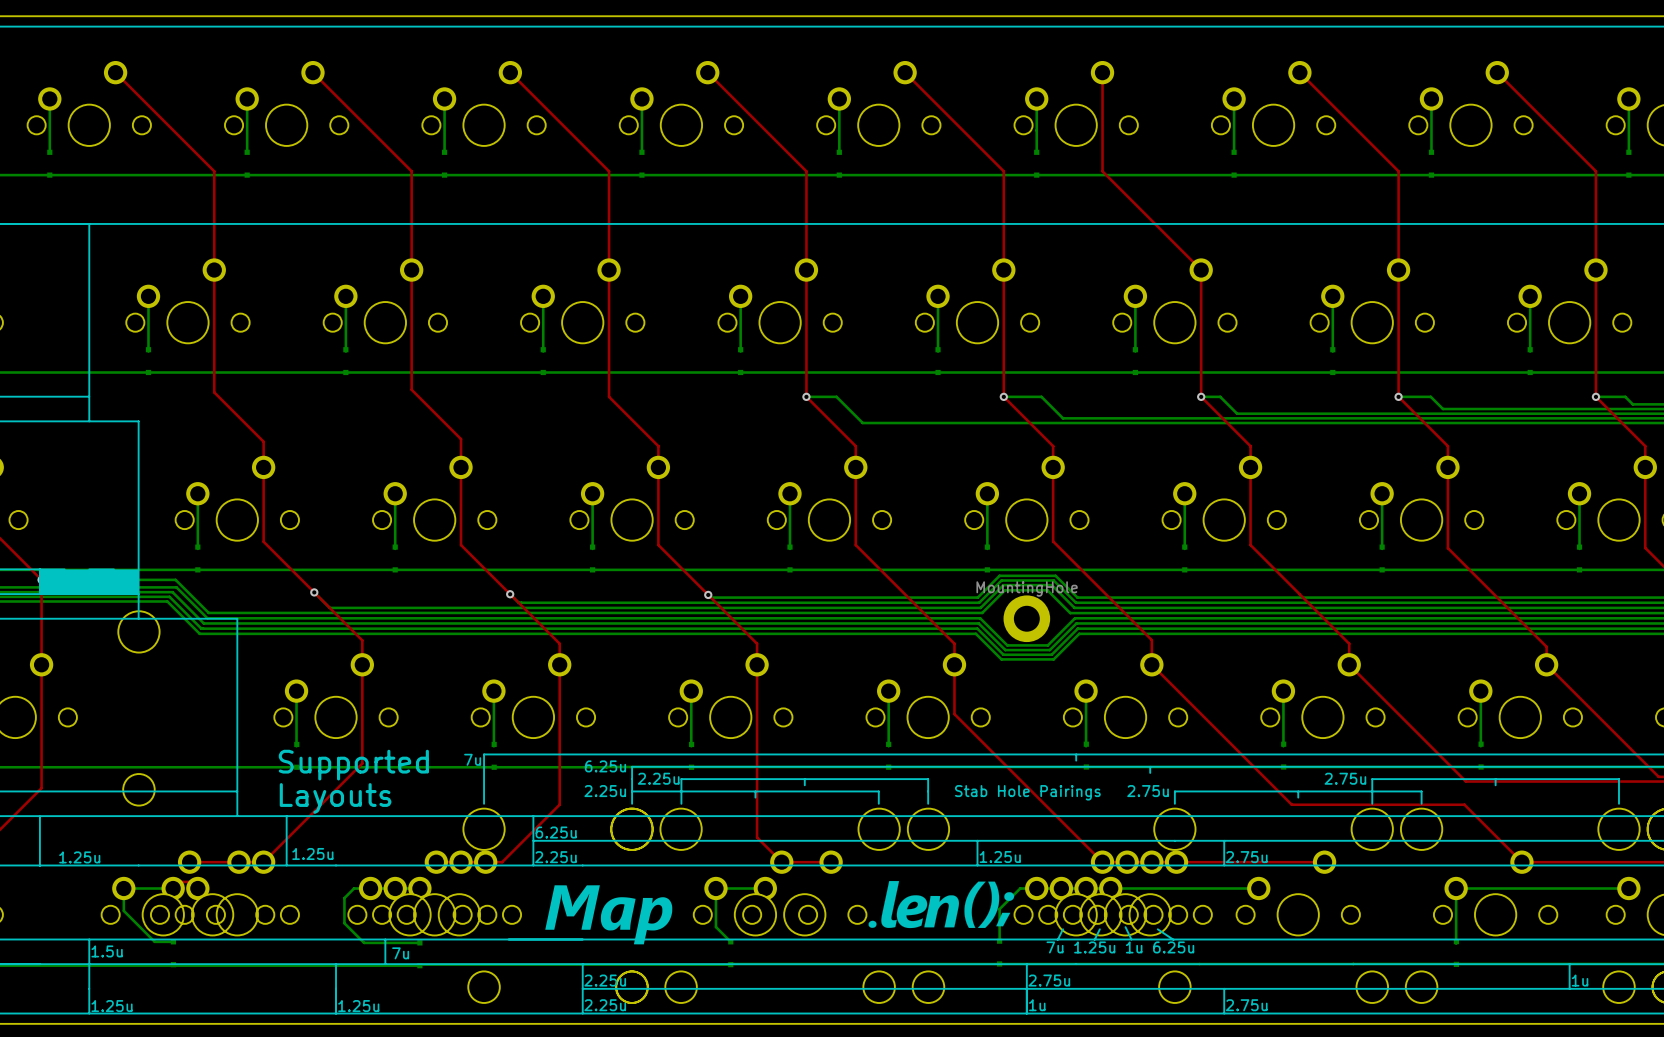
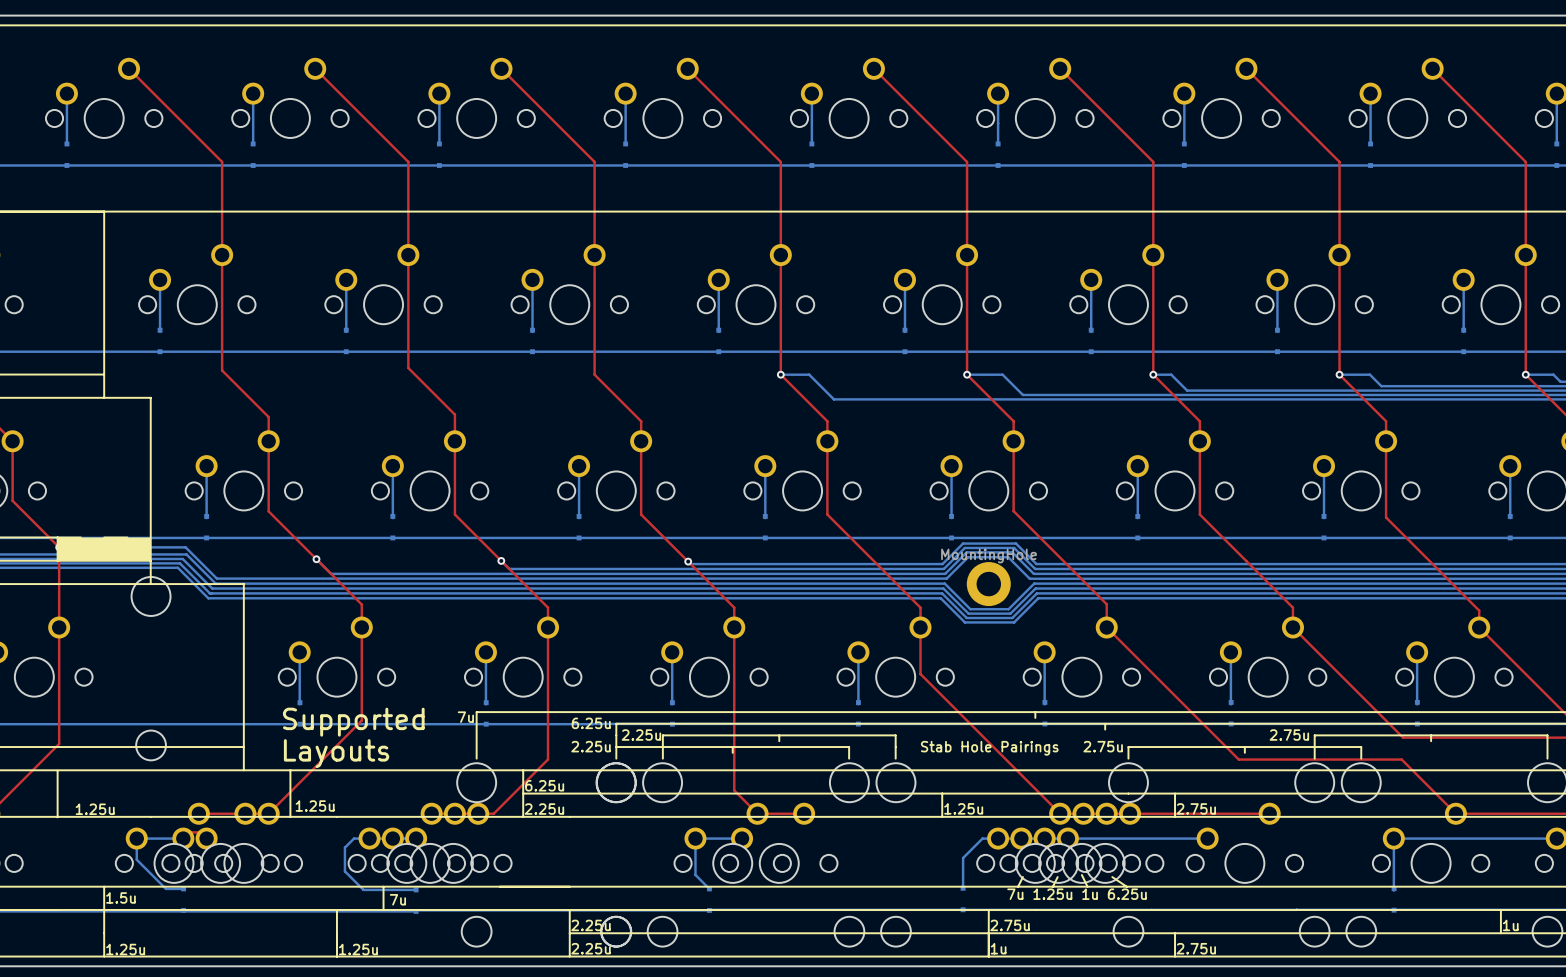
top track: (1102, 72) (1102, 171) (1201, 270) -> (1060, 68) (1153, 161) (1153, 255)
drawing: [868, 881, 1015, 929] -> none
drawing: [545, 885, 673, 945] -> none

